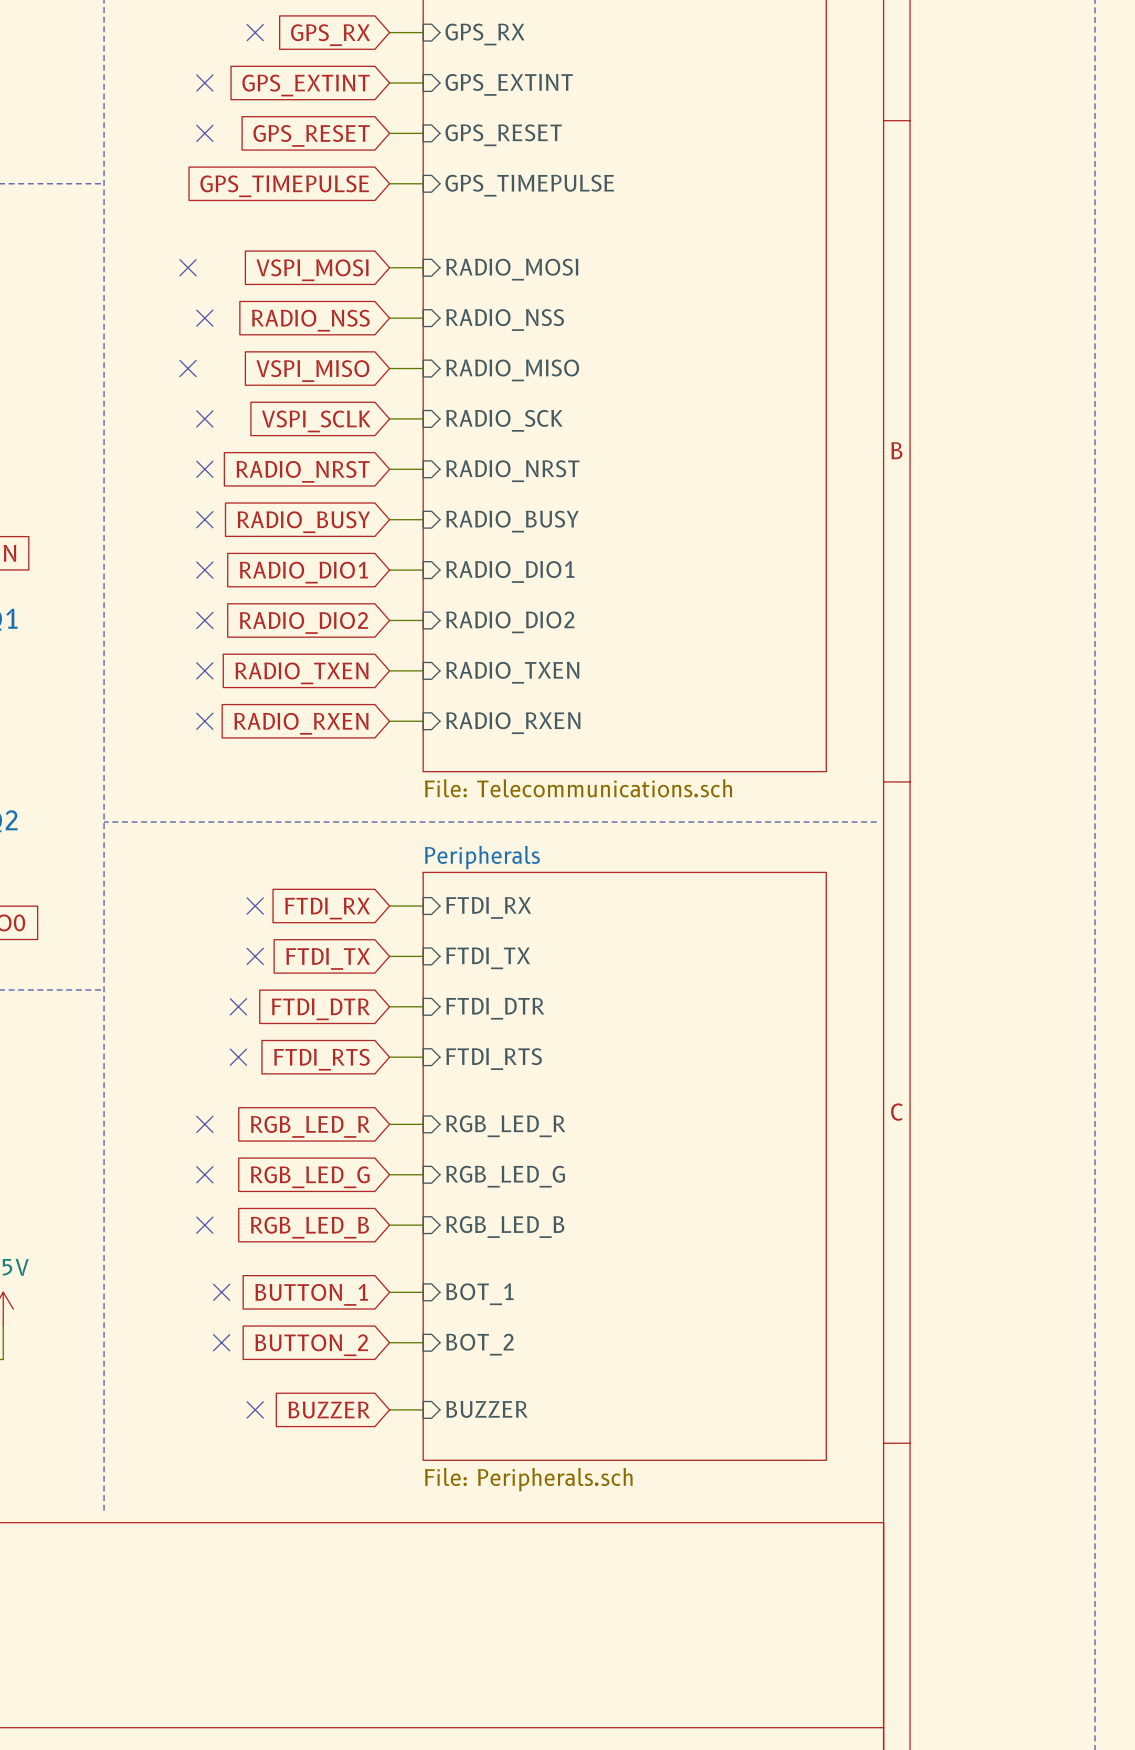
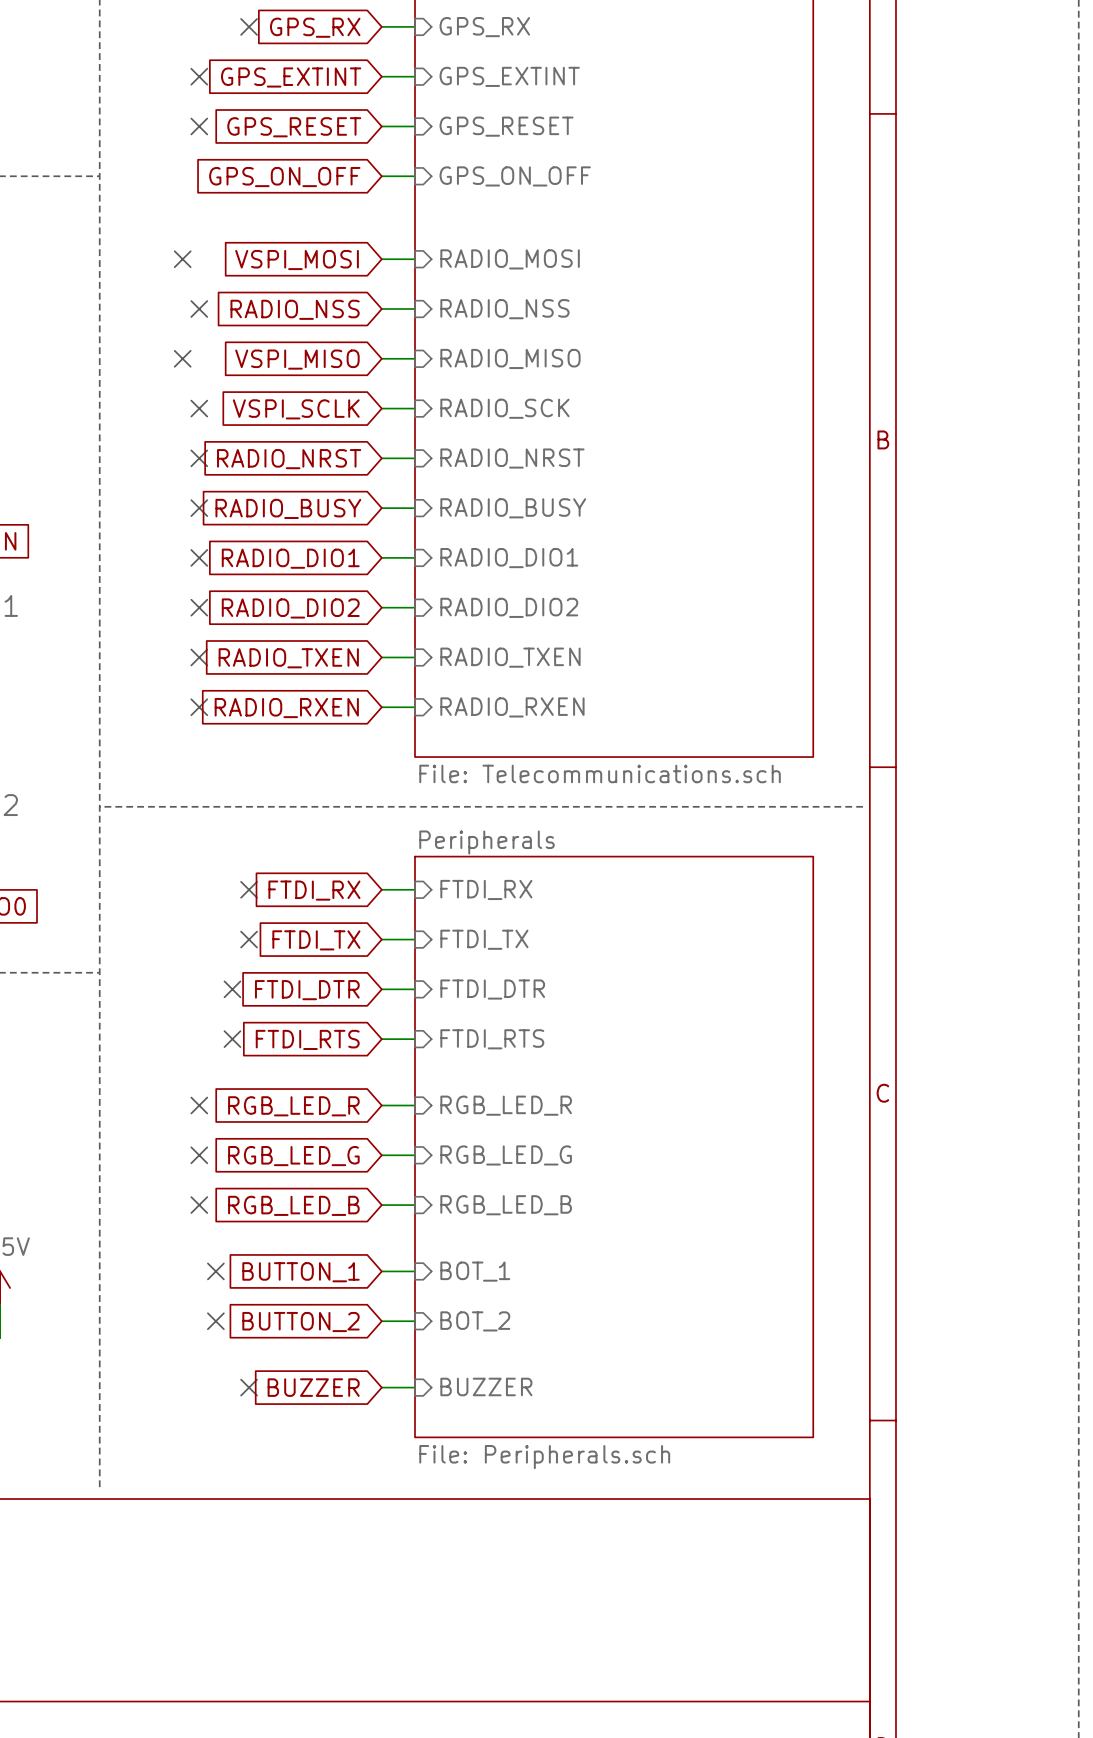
sheet pin: GPS_TIMEPULSE (529, 185) -> GPS_ON_OFF (515, 176)
global label: GPS_TIMEPULSE (284, 186) -> GPS_ON_OFF (284, 177)

